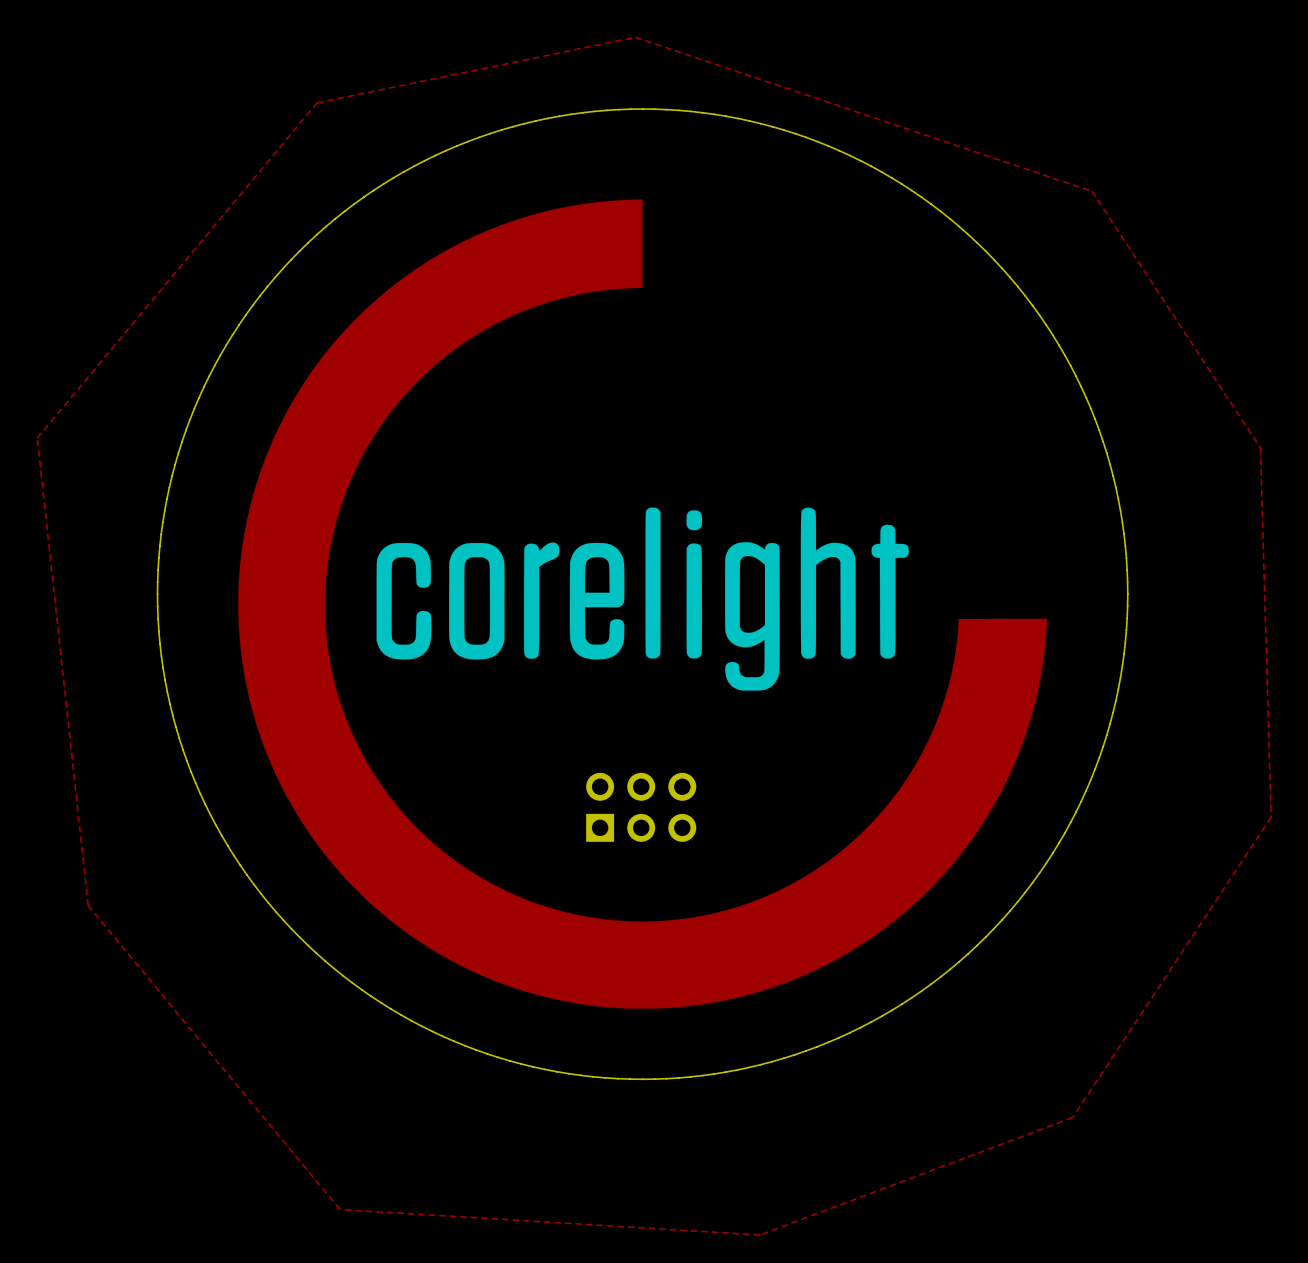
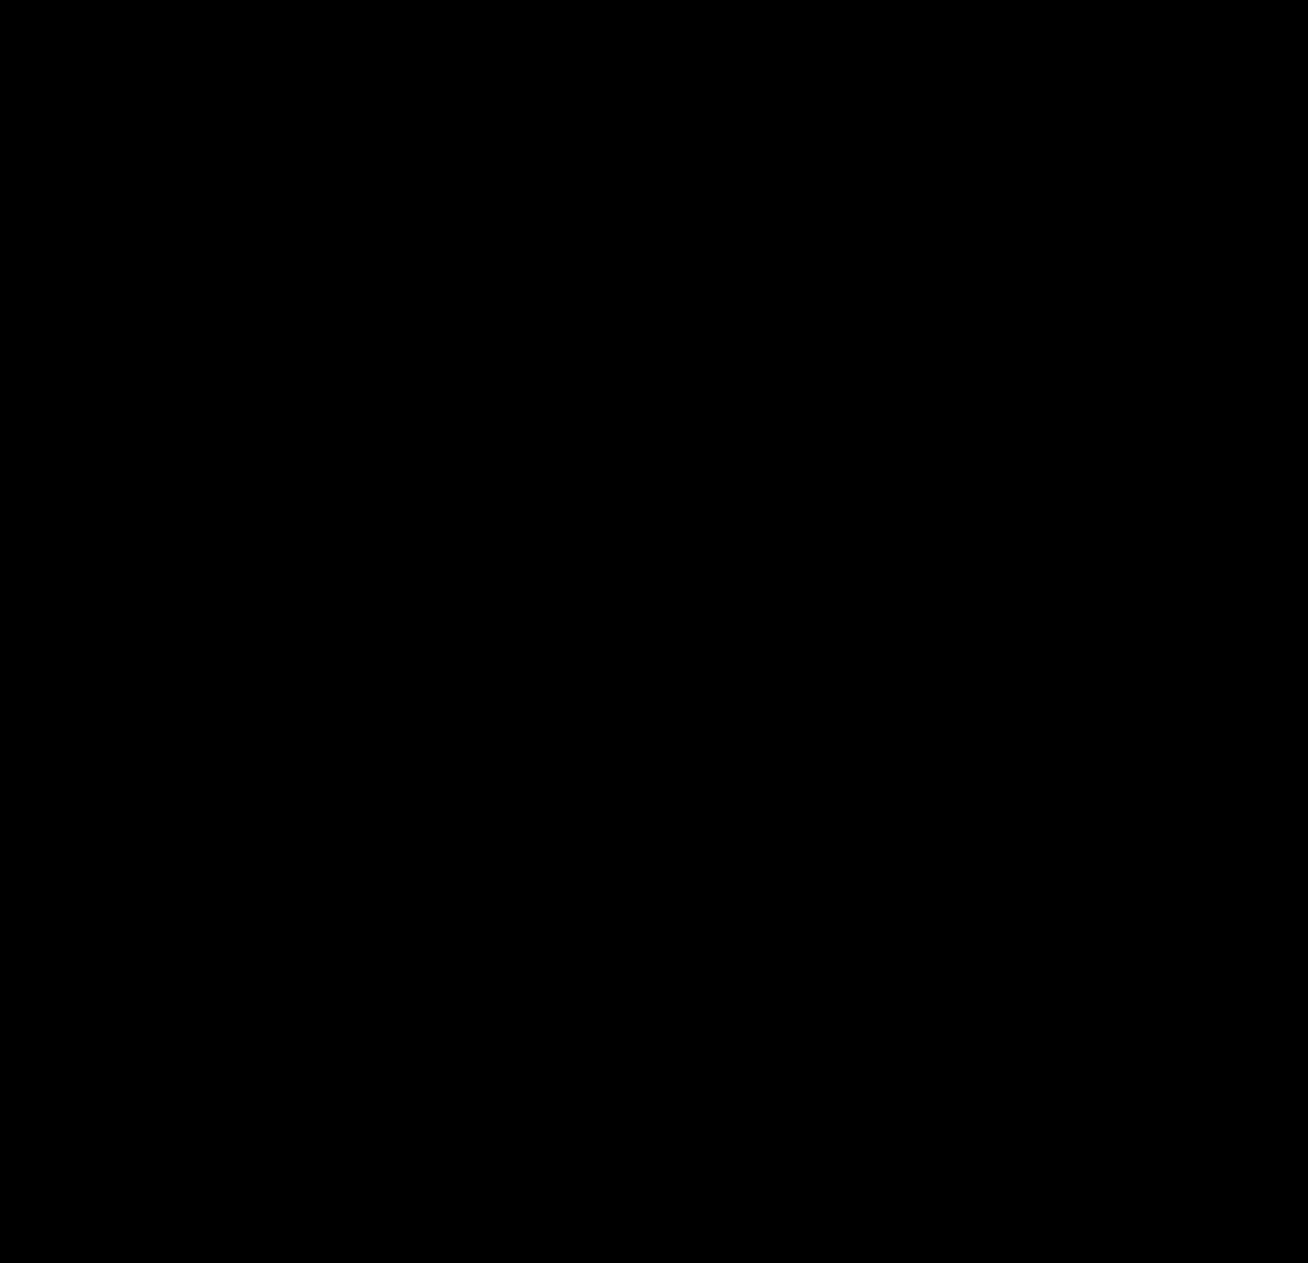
zone outline: (635, 37) (316, 102) (37, 438) (88, 905) (339, 1209) (760, 1234) (1072, 1117) (1271, 817) (1260, 448) (1092, 191) (635, 37) -> none
board edge: (642, 109) (690, 111) (737, 118) (783, 129) (828, 145) (871, 166) (911, 190) (950, 218) (985, 251) (1017, 286) (1046, 325) (1070, 365) (1090, 408) (1106, 453) (1118, 499) (1125, 546) (1127, 594) (1125, 642) (1118, 689) (1106, 735) (1090, 779) (1070, 822) (1046, 863) (1017, 901) (985, 937) (950, 969) (911, 997) (871, 1022) (828, 1042) (783, 1058) (737, 1069) (690, 1076) (642, 1079) (593, 1076) (544, 1069) (498, 1057) (453, 1041) (411, 1020) (371, 996) (334, 968) (299, 937) (268, 902) (240, 865) (216, 825) (195, 782) (179, 738) (167, 691) (160, 643) (157, 594) (159, 546) (166, 499) (178, 453) (194, 408) (214, 365) (239, 325) (267, 286) (299, 251) (335, 218) (373, 190) (414, 166) (456, 145) (501, 129) (547, 118) (594, 111) (642, 109) -> none
drawing: [238, 199, 1048, 1009] -> none
part: (641, 807) -> none

